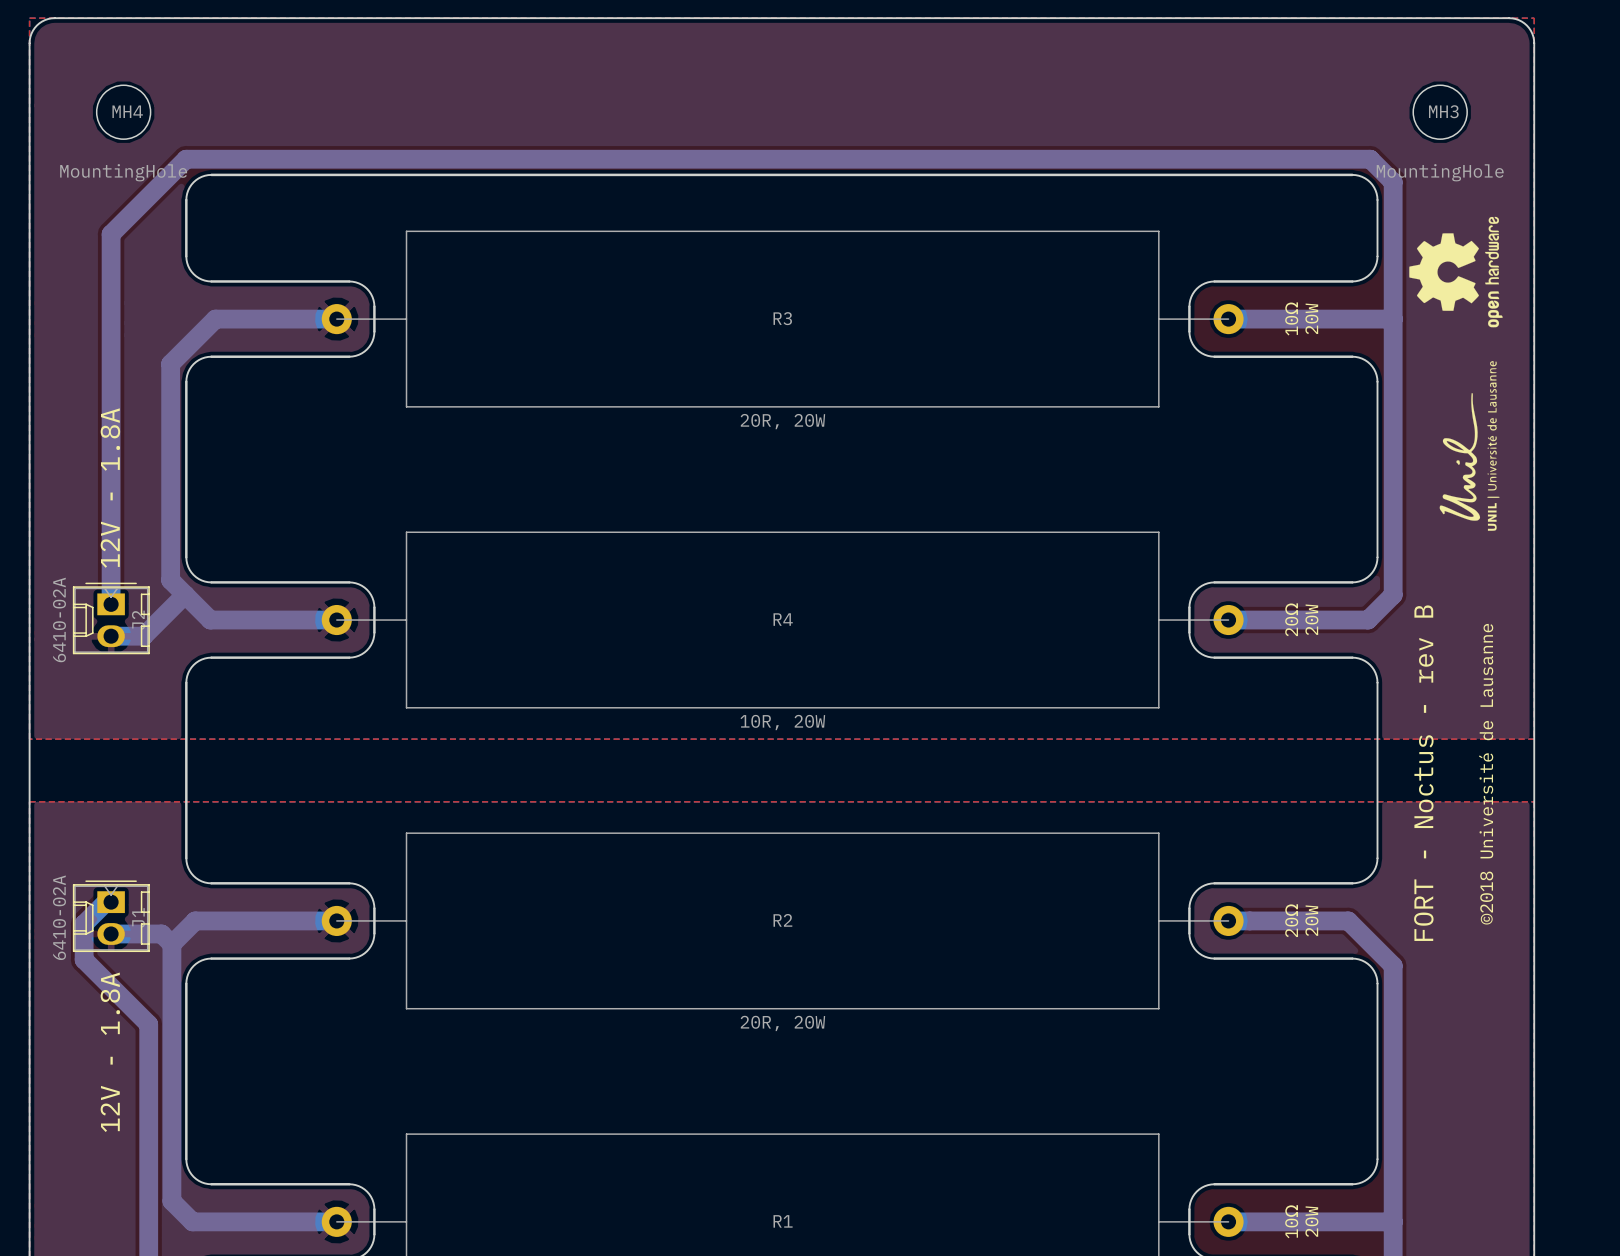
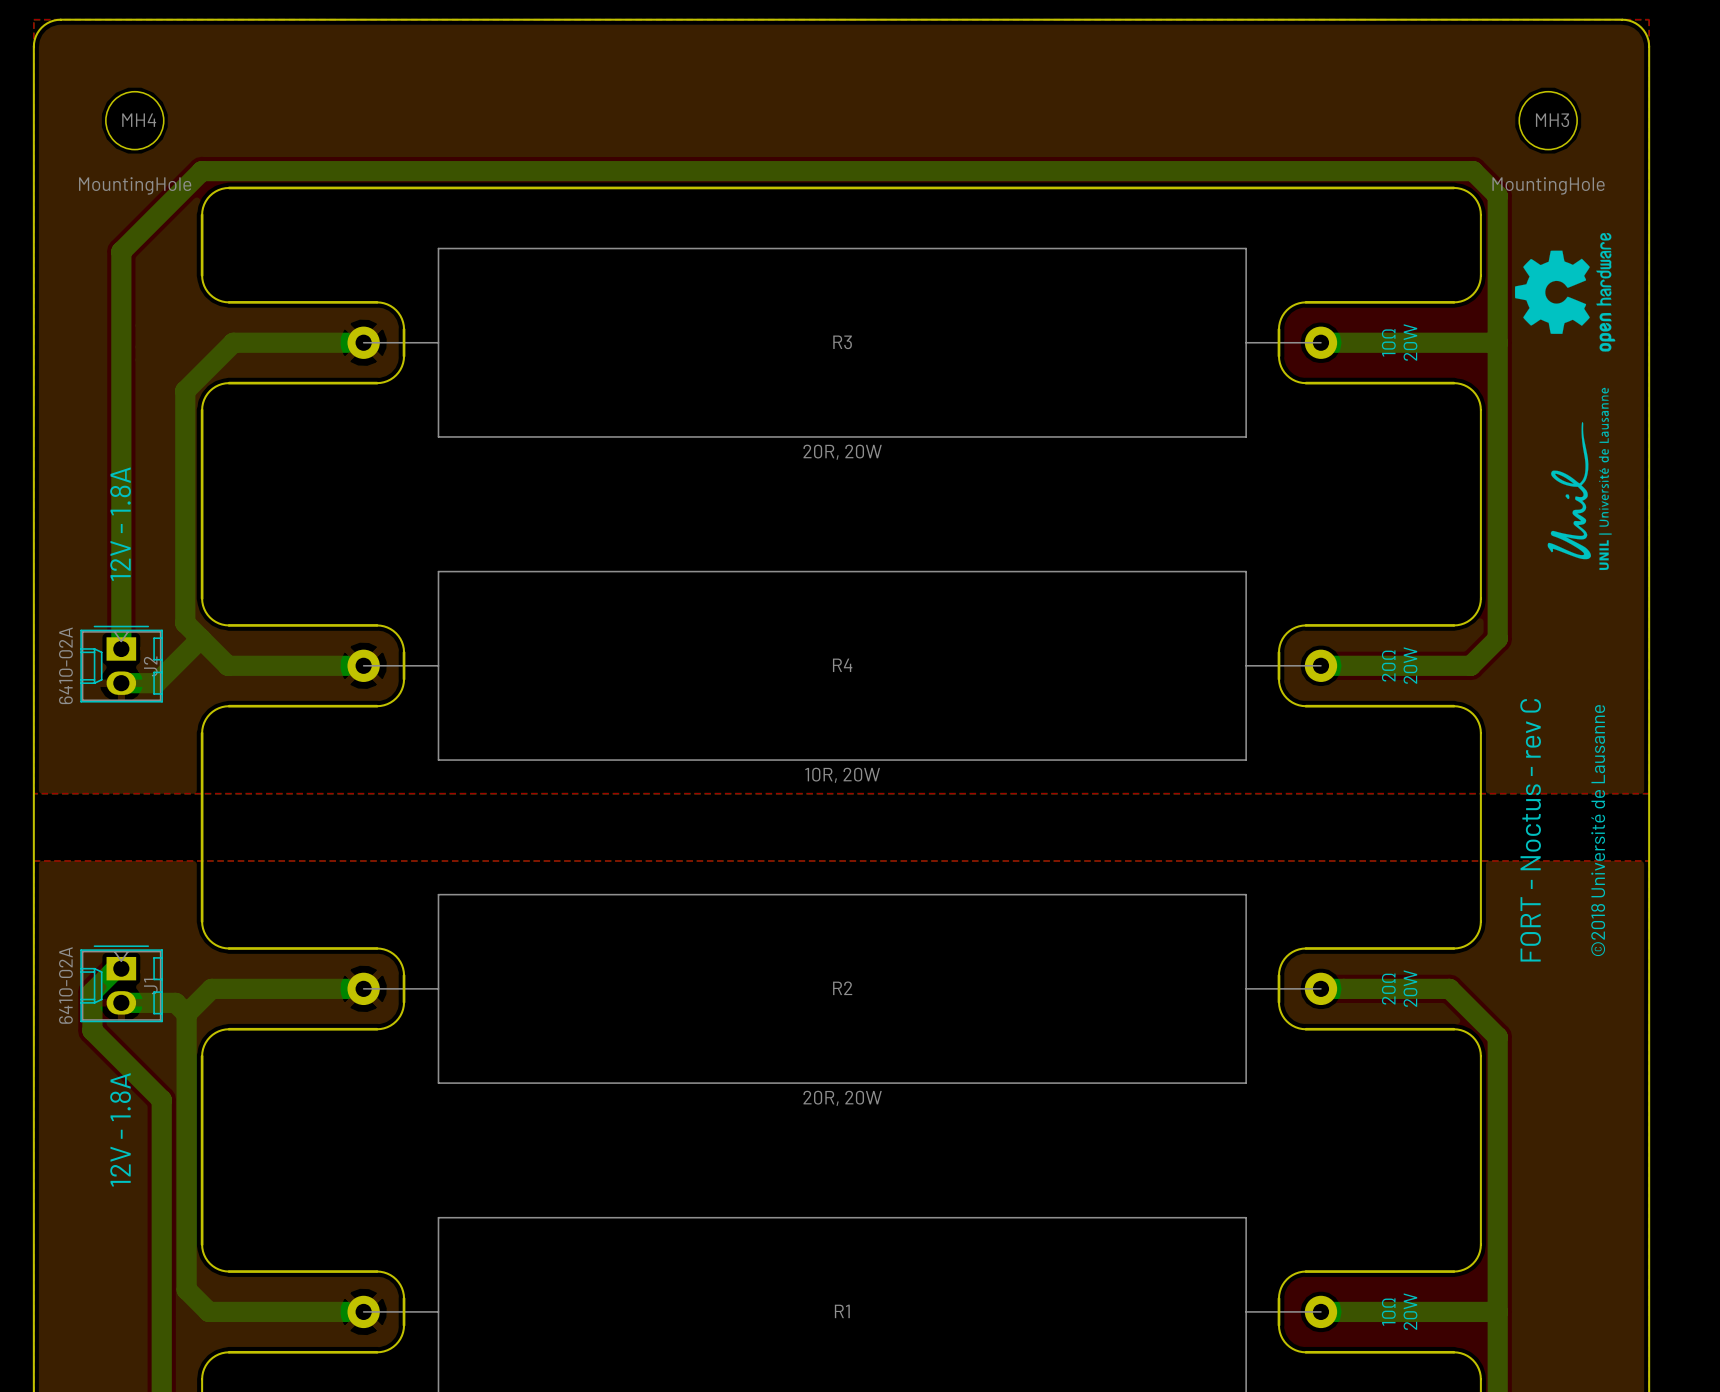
text: FORT - Noctus - rev B (1423, 773) -> FORT - Noctus - rev C (1530, 830)

